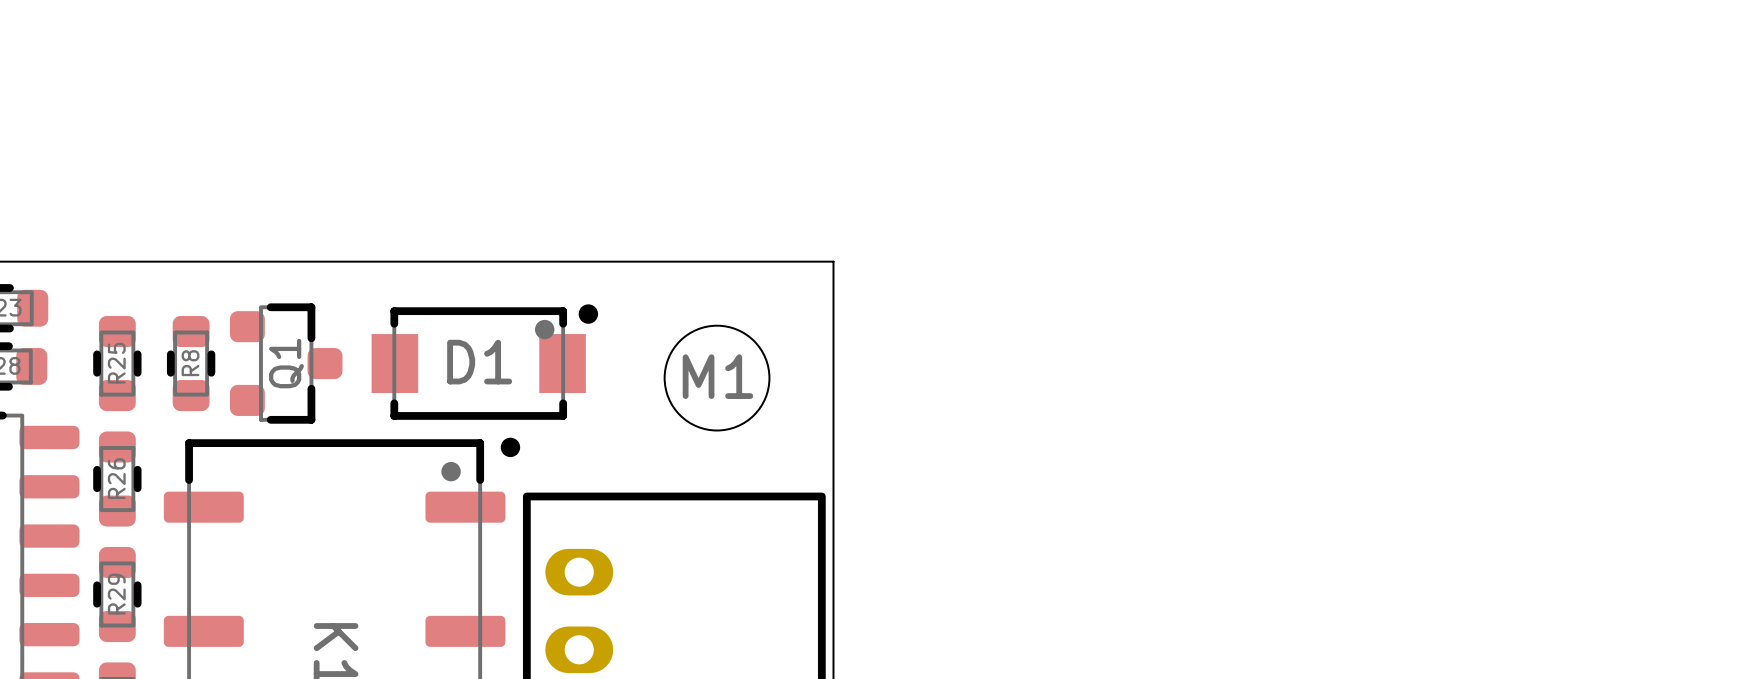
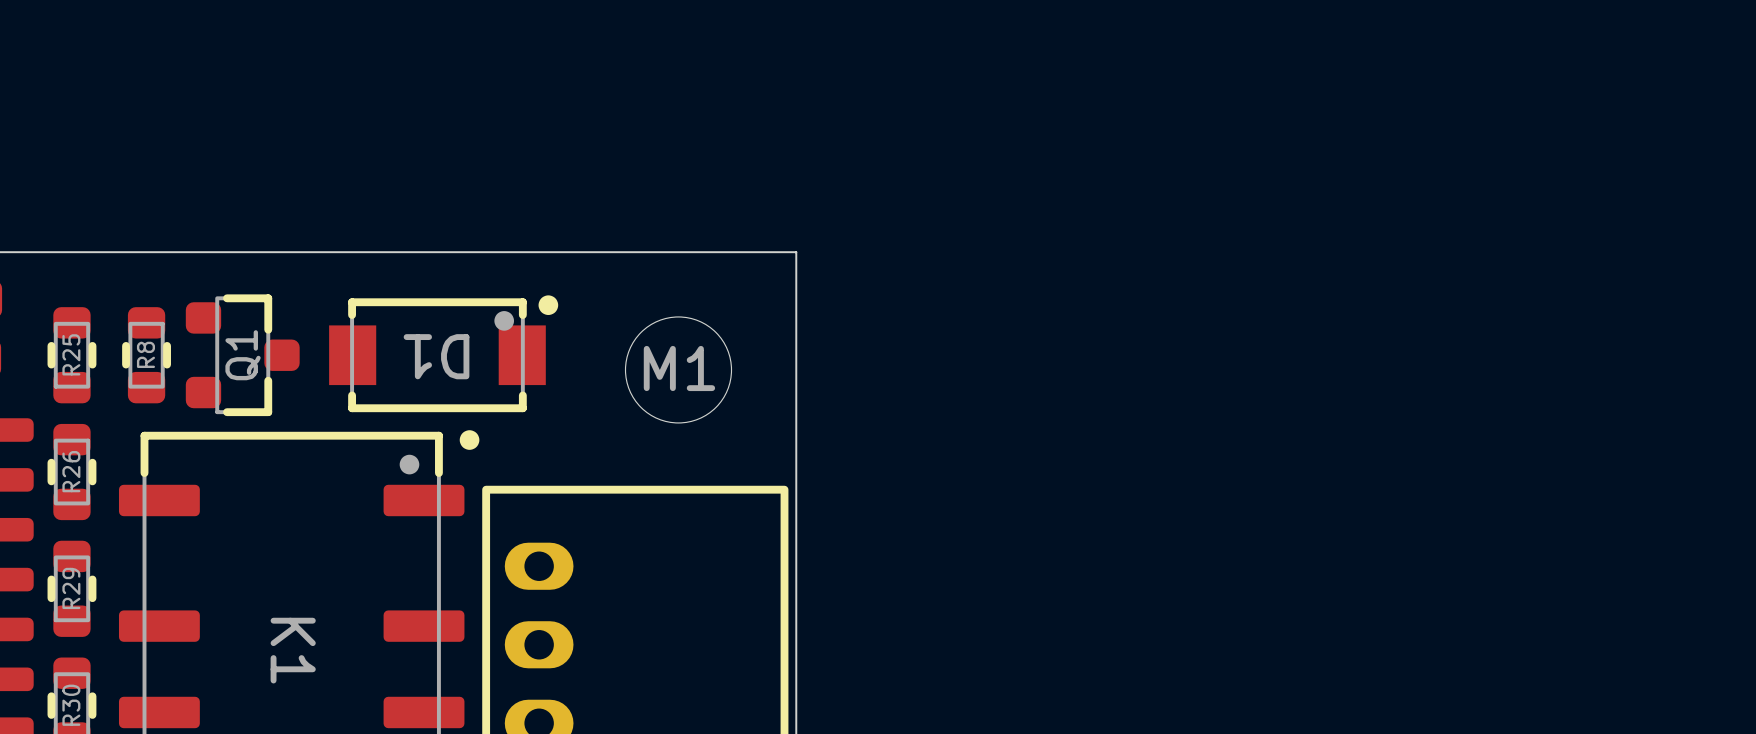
D1 name rotation: 0° (479, 362) -> 180° (436, 356)

